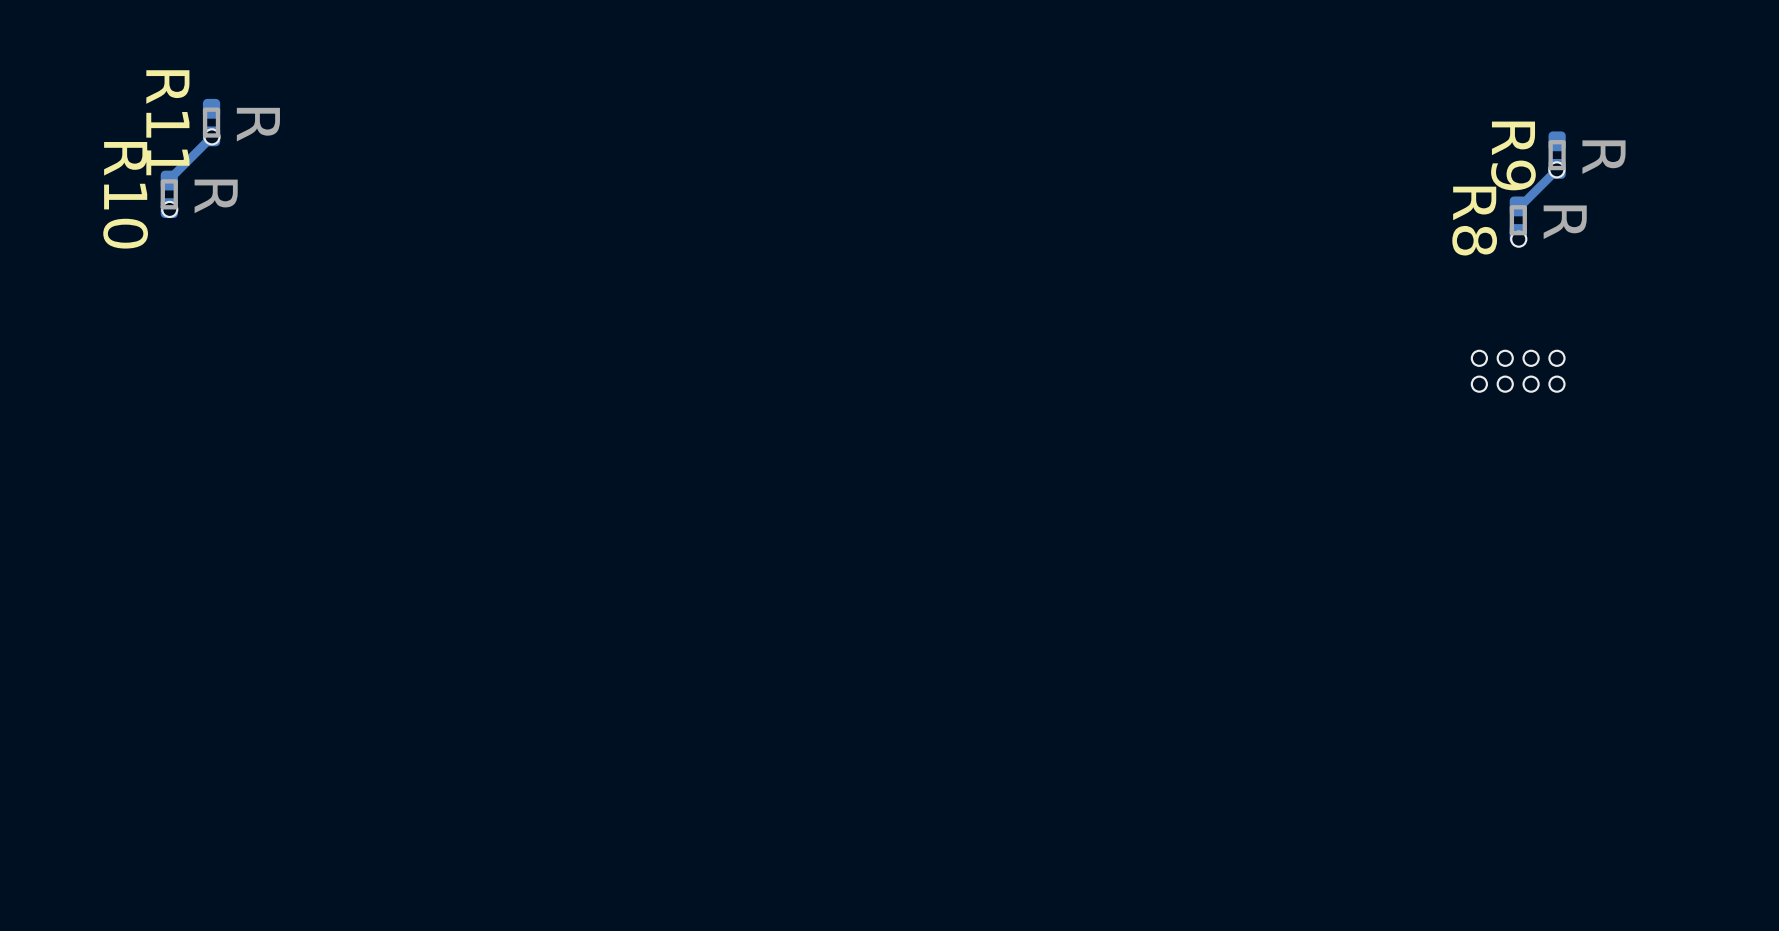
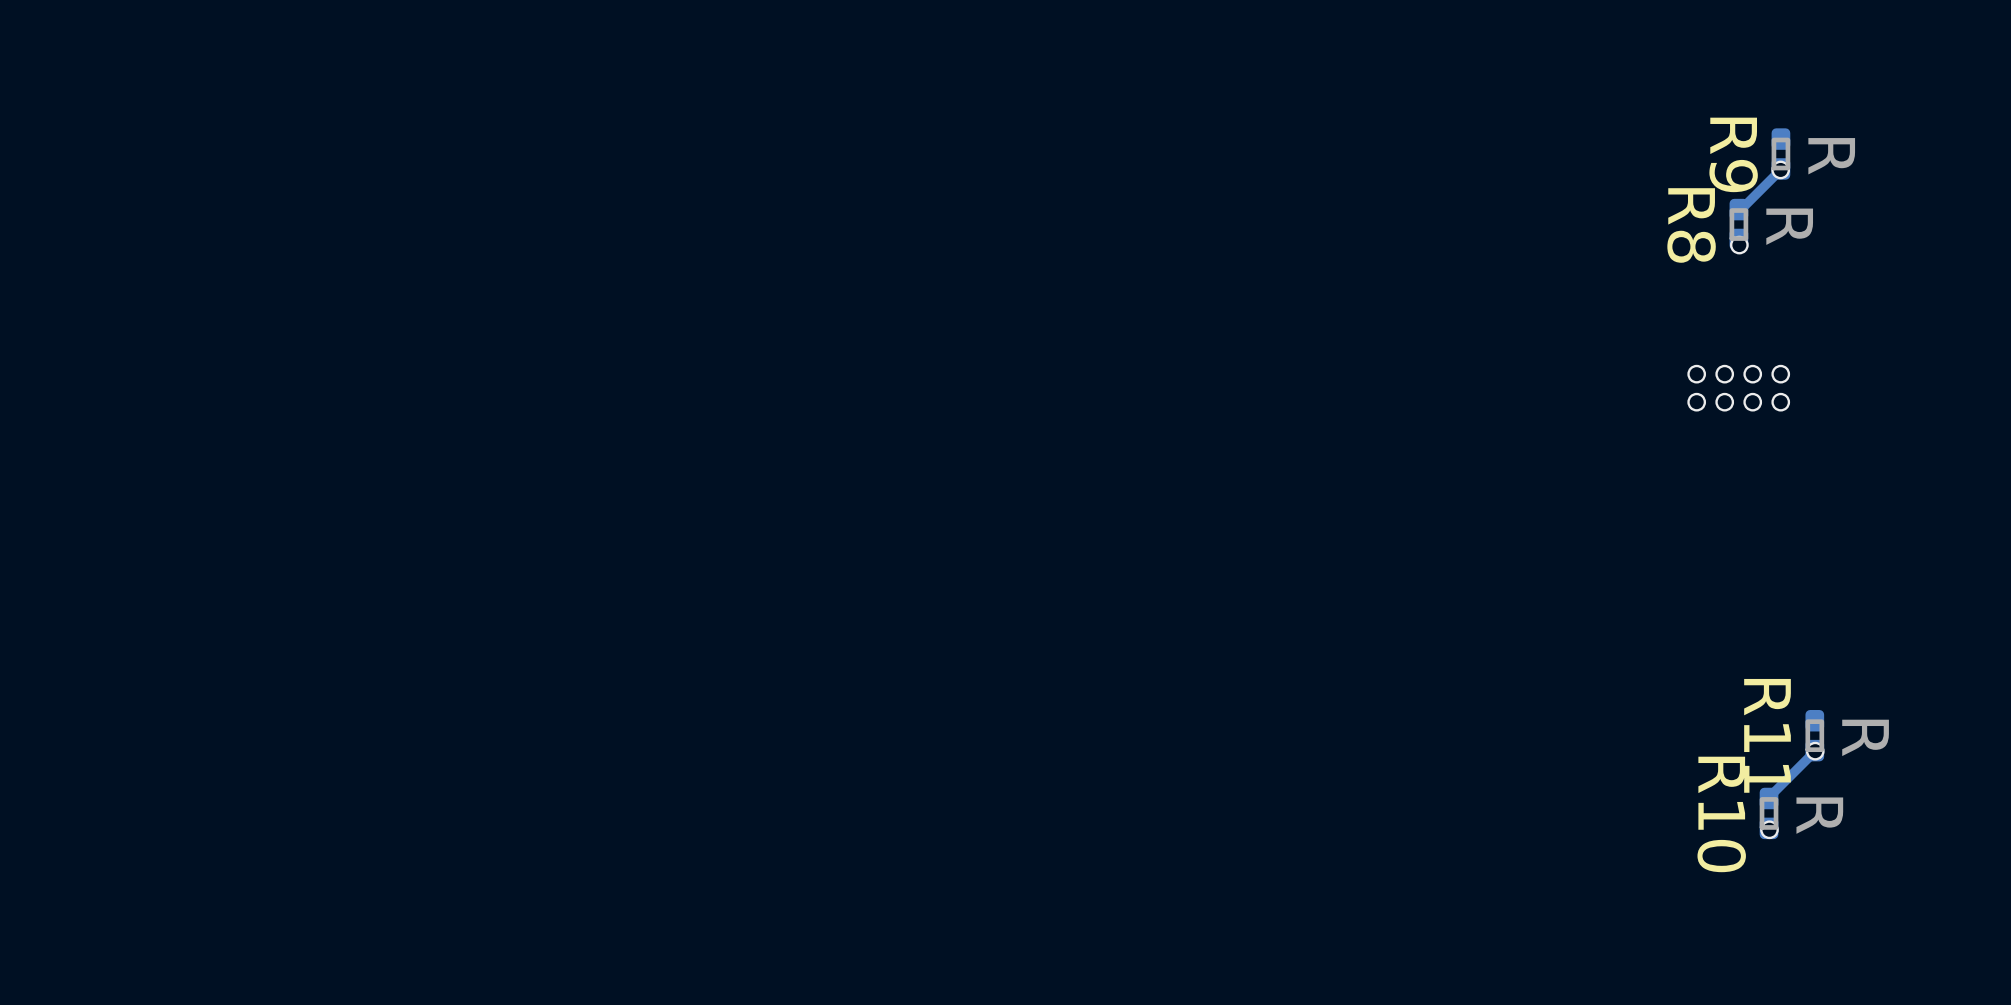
R11 position: (211, 122) -> (1814, 735)
track: (211, 136) (169, 180) -> none
via: (211, 136) -> none
R10 position: (169, 194) -> (1769, 813)
via: (169, 209) -> none
track: none -> (1815, 751) (1769, 798)
via: none -> (1815, 751)
via: none -> (1769, 829)

